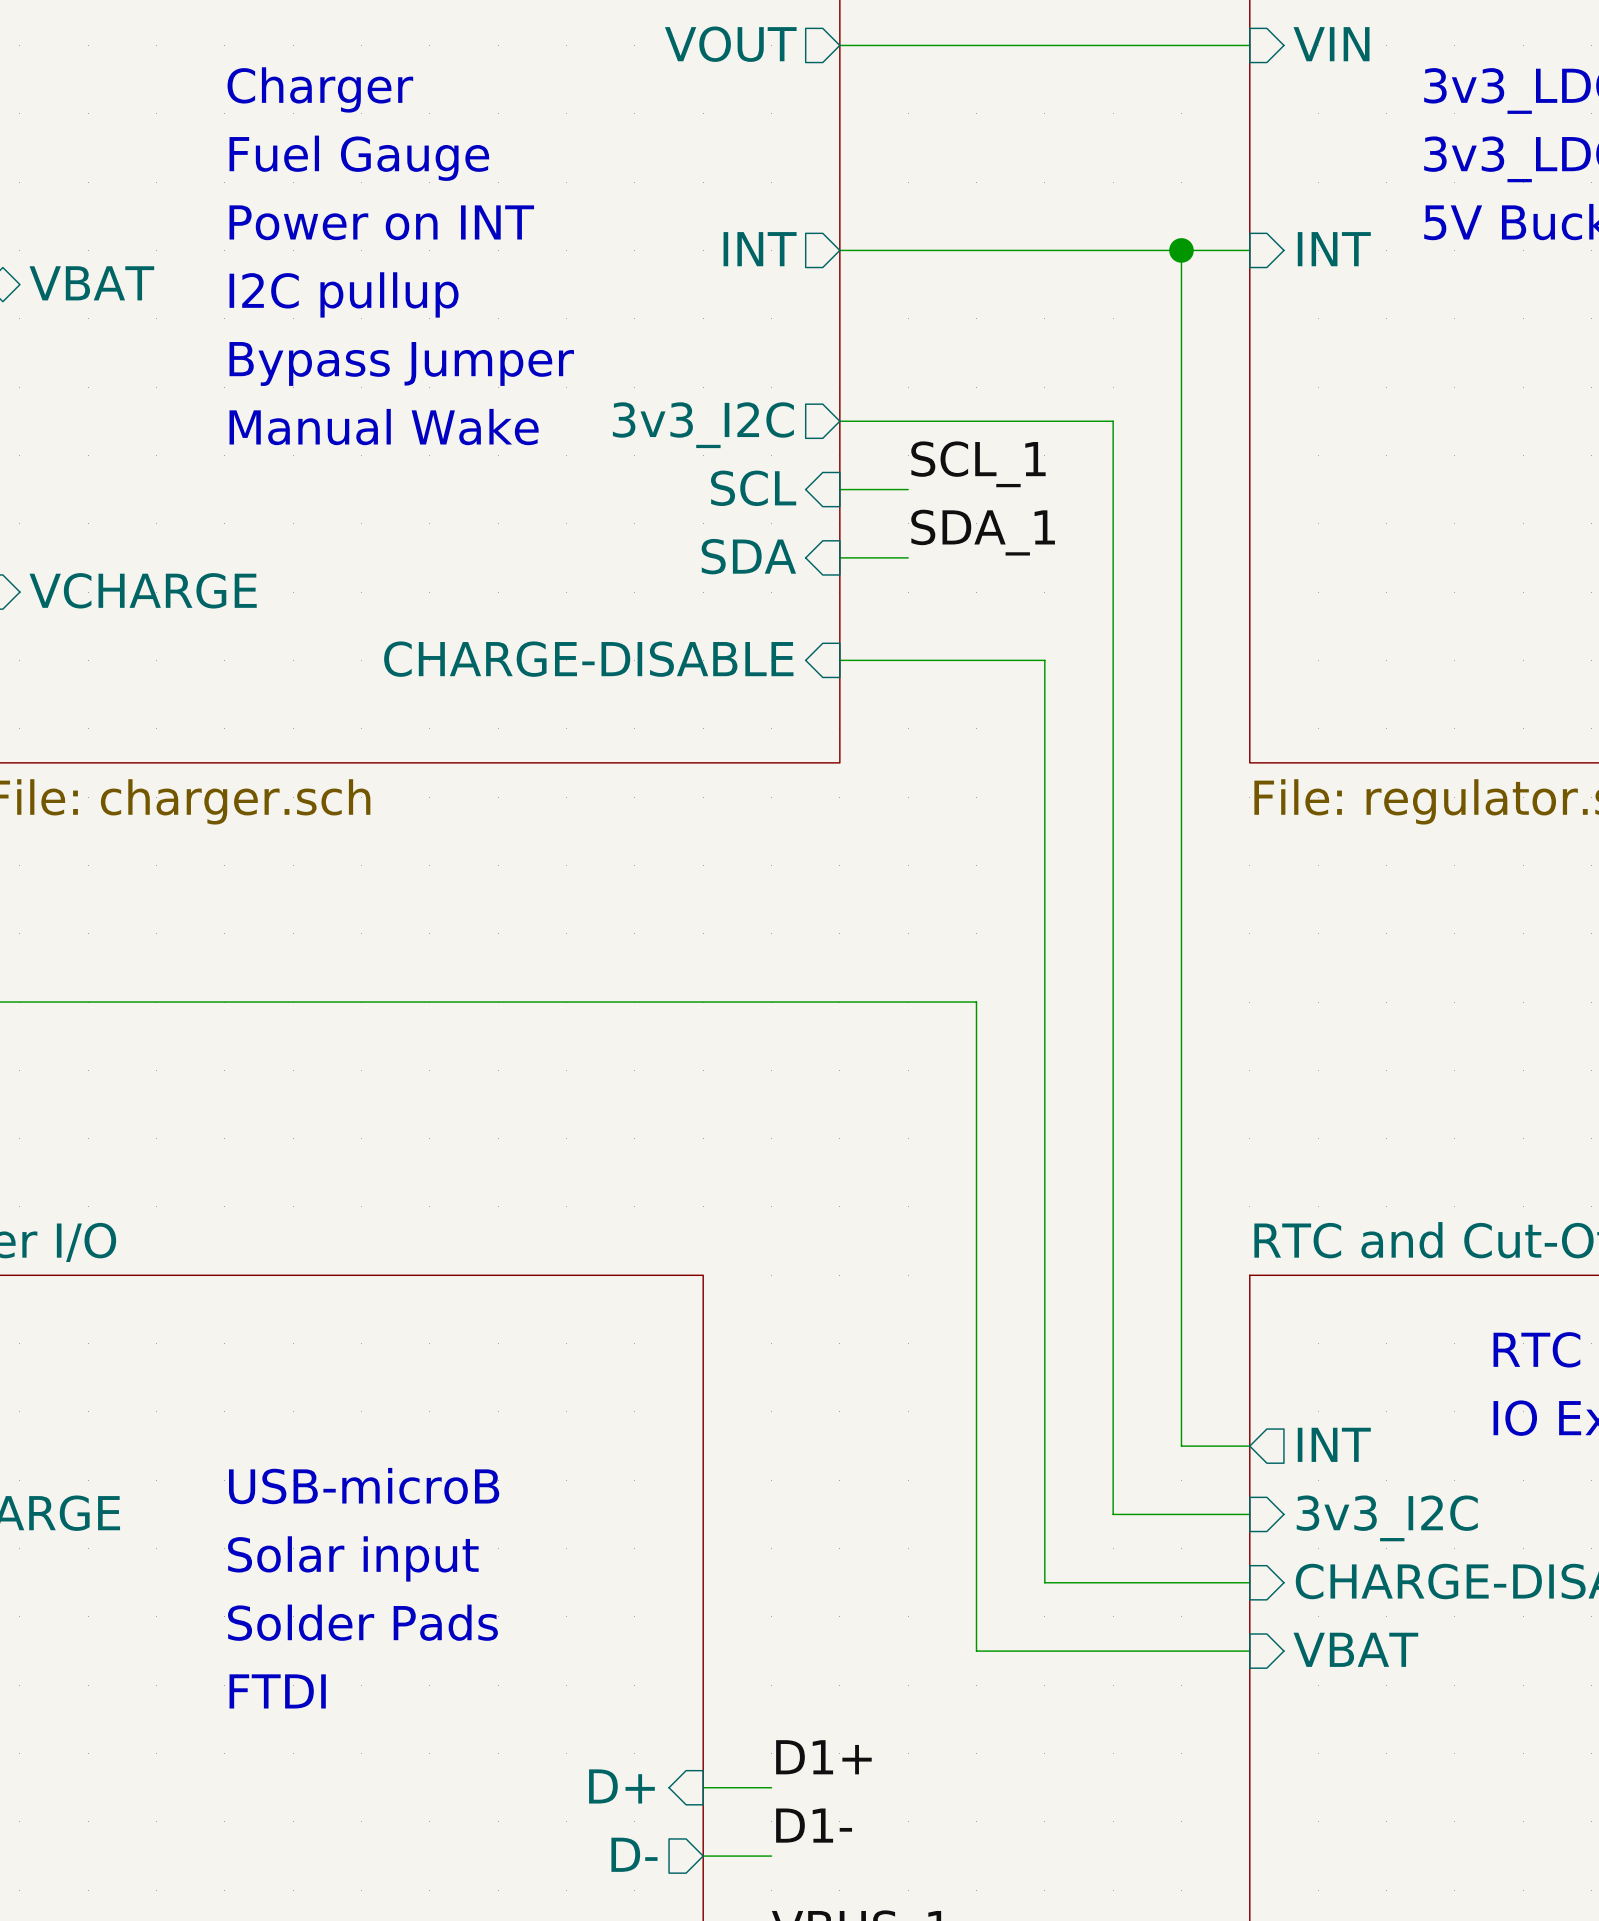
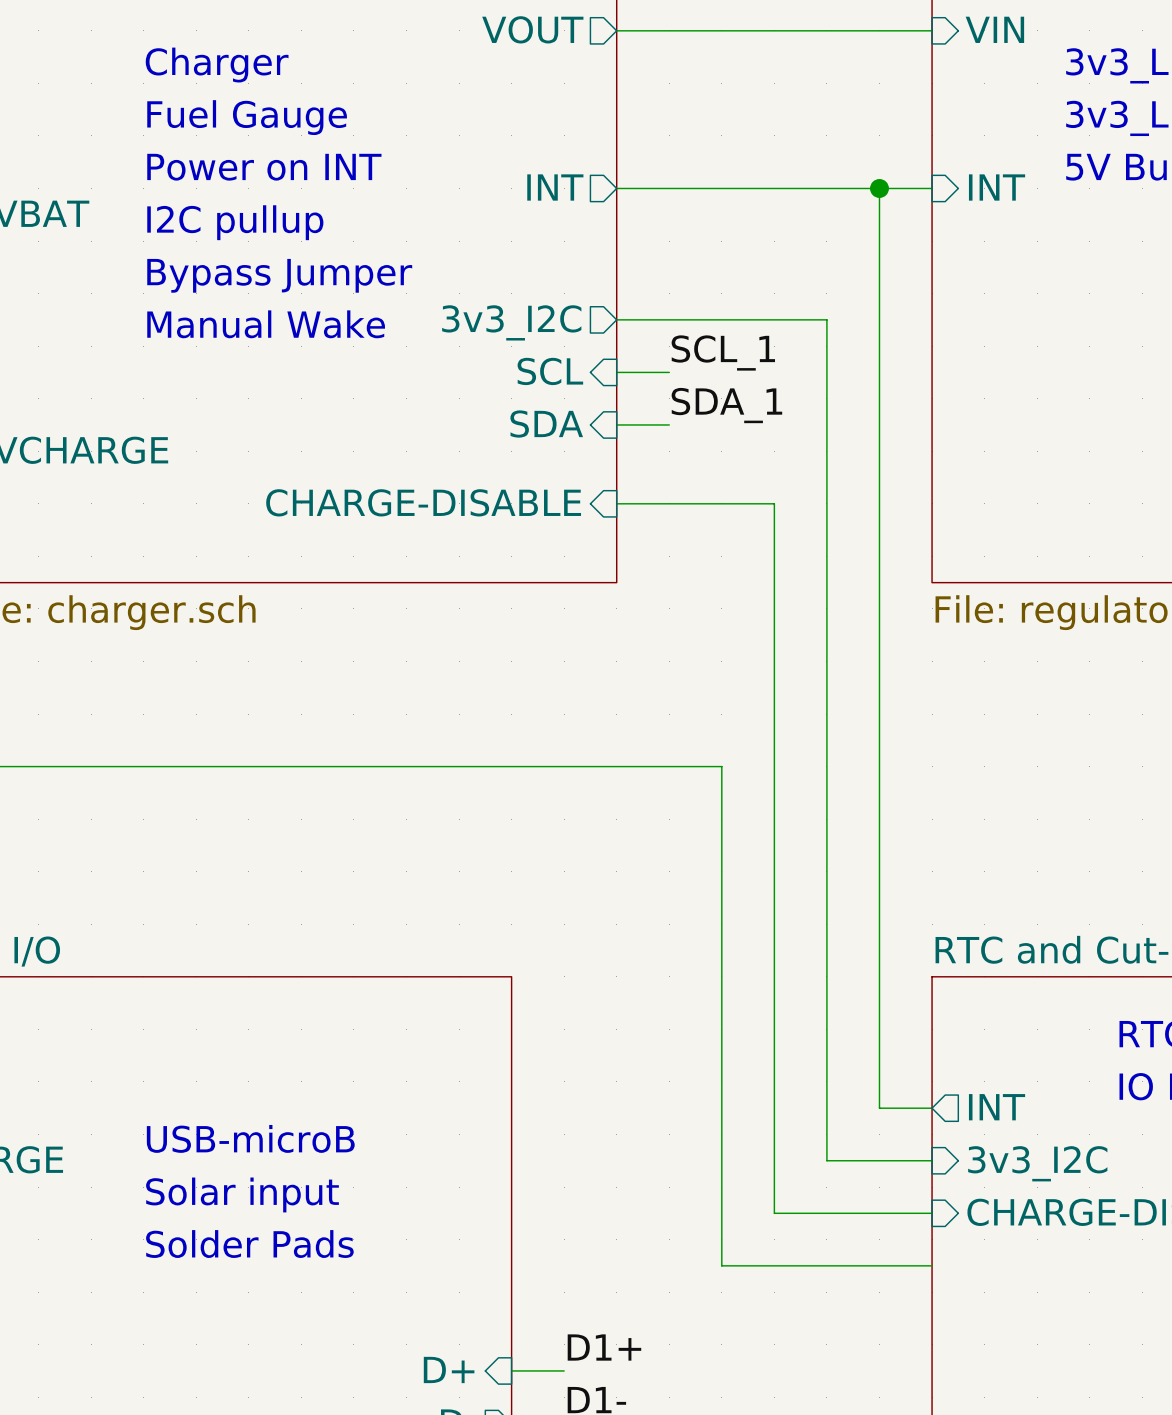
sheet pin: VBAT (1355, 1649) -> none
text: FTDI (277, 1691) -> none

